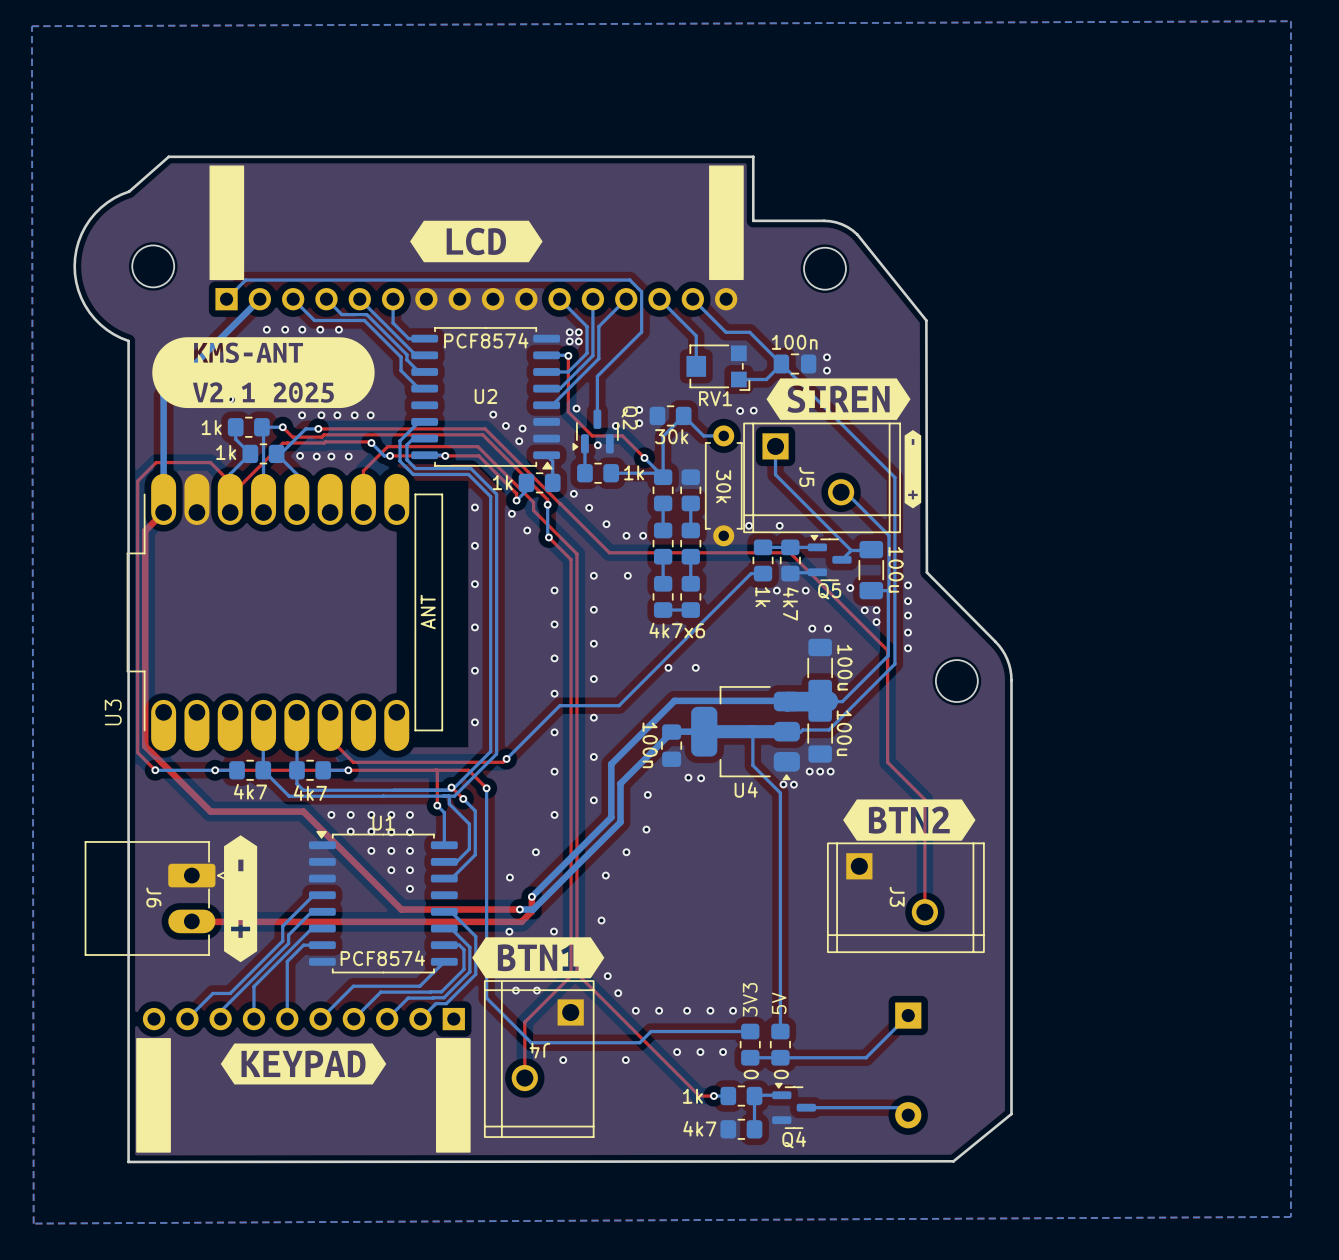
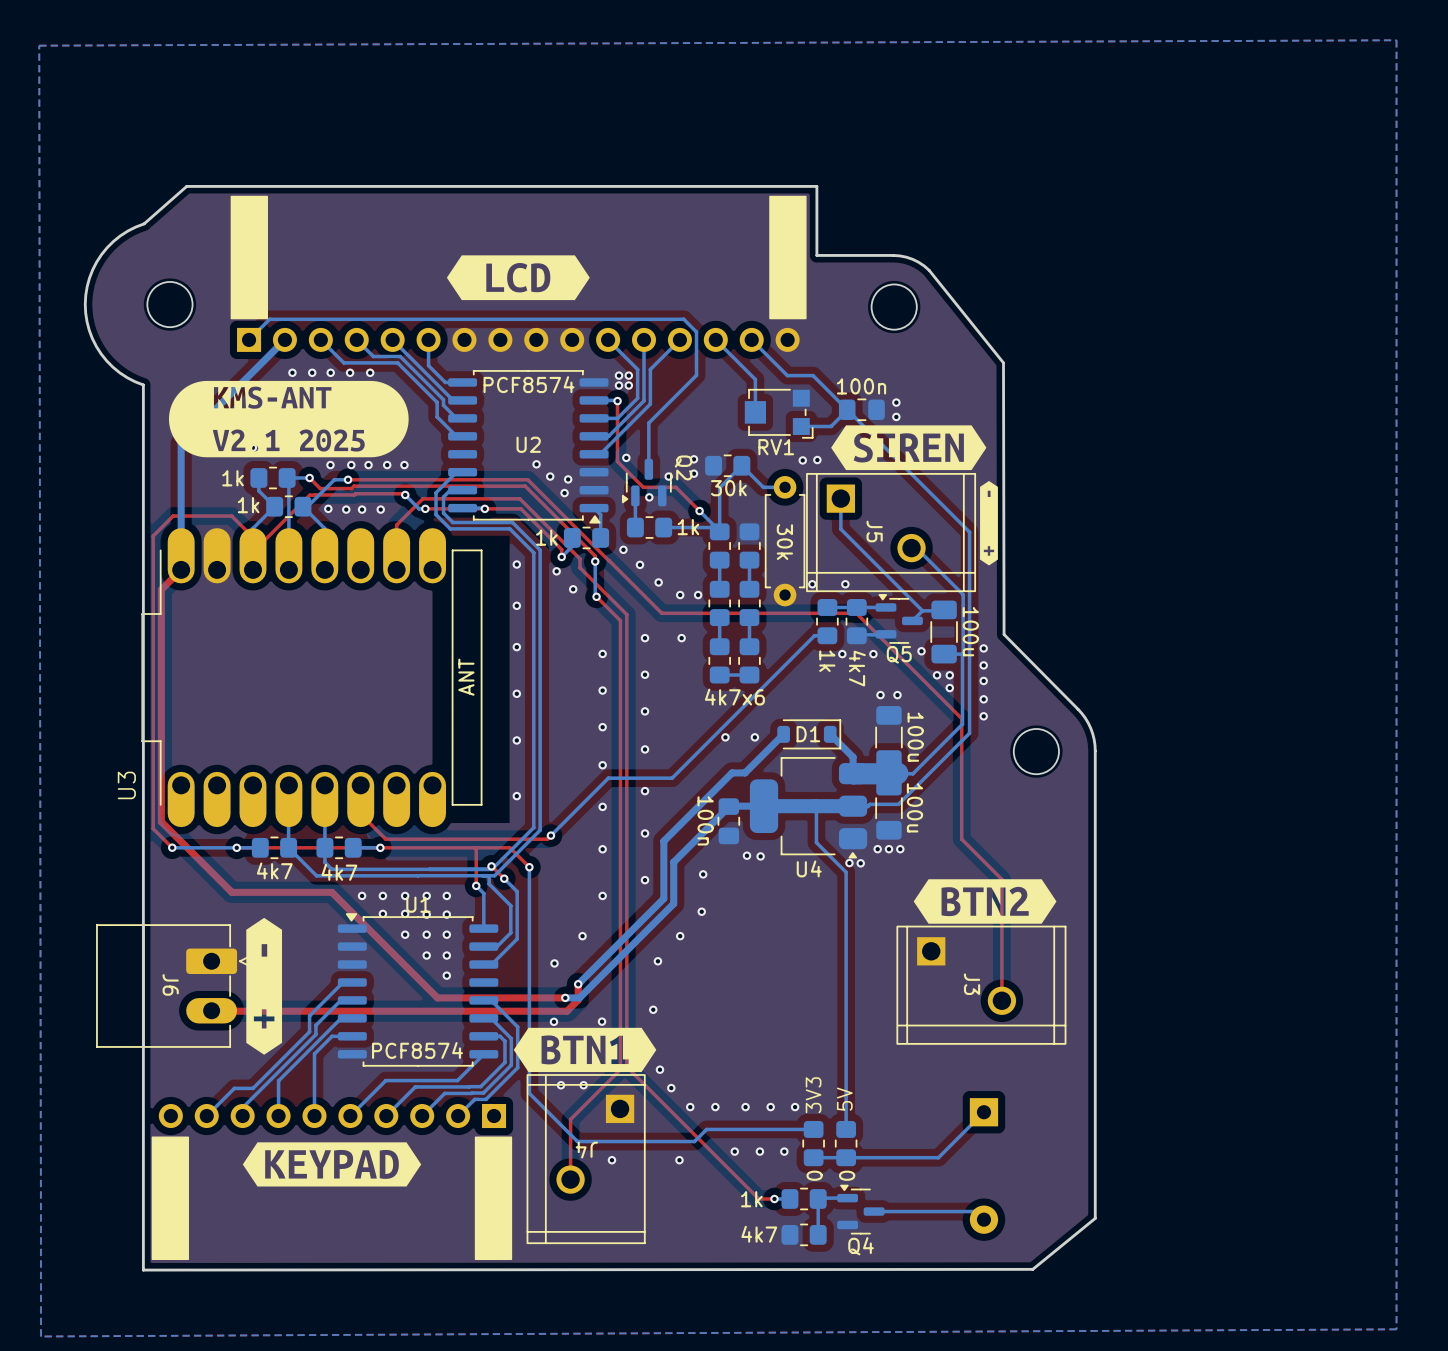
D1: none -> (809, 734)
bottom track: none -> (830, 734) (853, 757) (853, 773)
bottom track: (786, 700) (686, 700) -> (783, 734) (745, 772)

